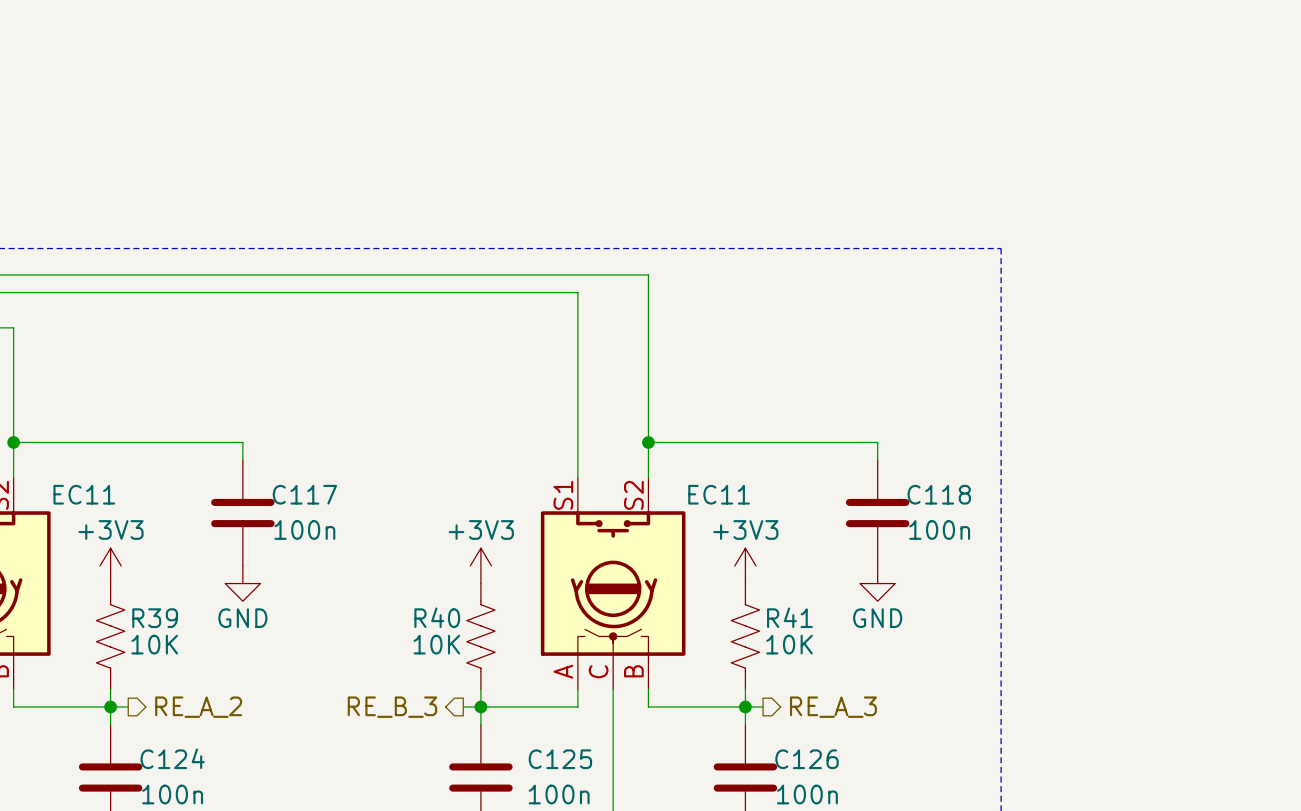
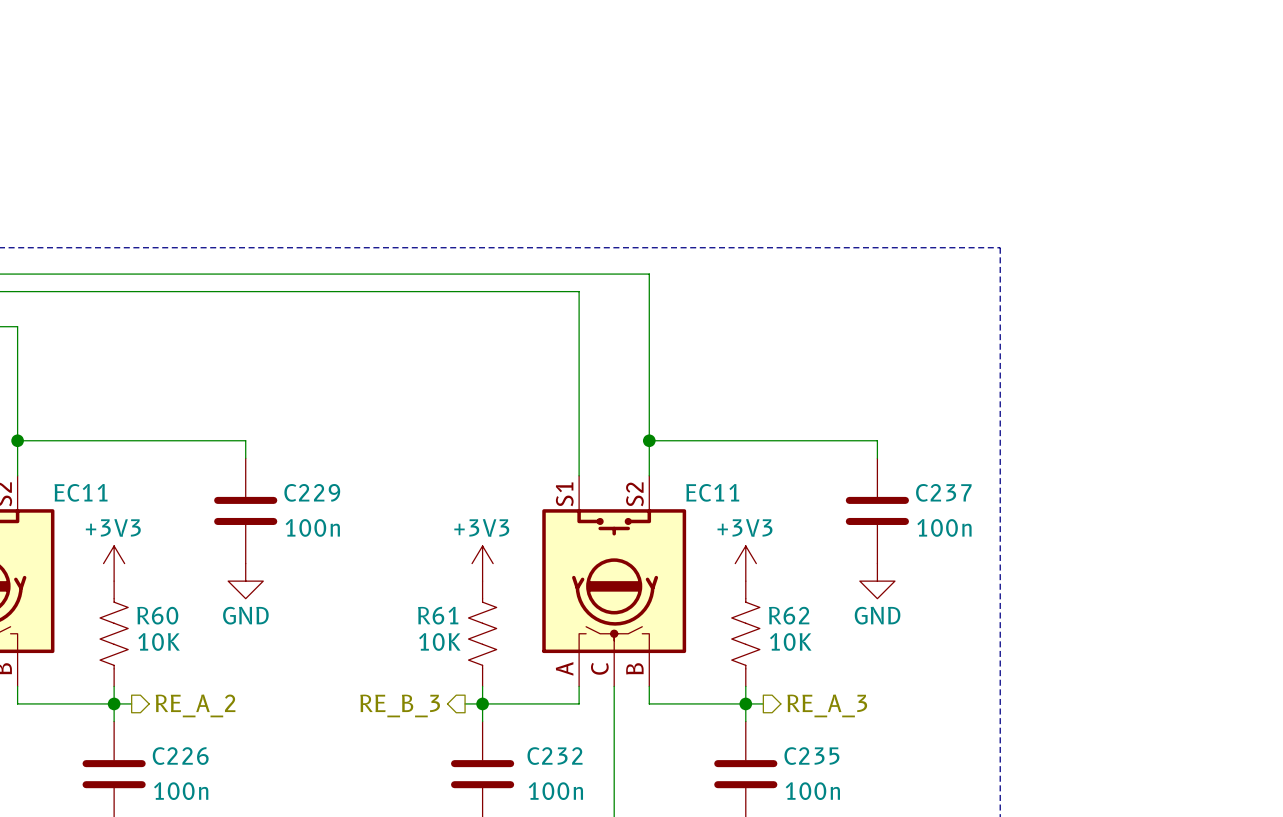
C117 name: C117 (304, 494) -> C229 (312, 492)
C118 name: C118 (939, 494) -> C237 (943, 492)
R40 name: R40 (437, 617) -> R61 (438, 615)
R41 name: R41 (789, 617) -> R62 (789, 615)
R39 name: R39 (155, 618) -> R60 (157, 615)
C124 name: C124 (172, 758) -> C226 (180, 756)
C125 name: C125 (560, 759) -> C232 (555, 756)
C126 name: C126 (807, 759) -> C235 (811, 756)

